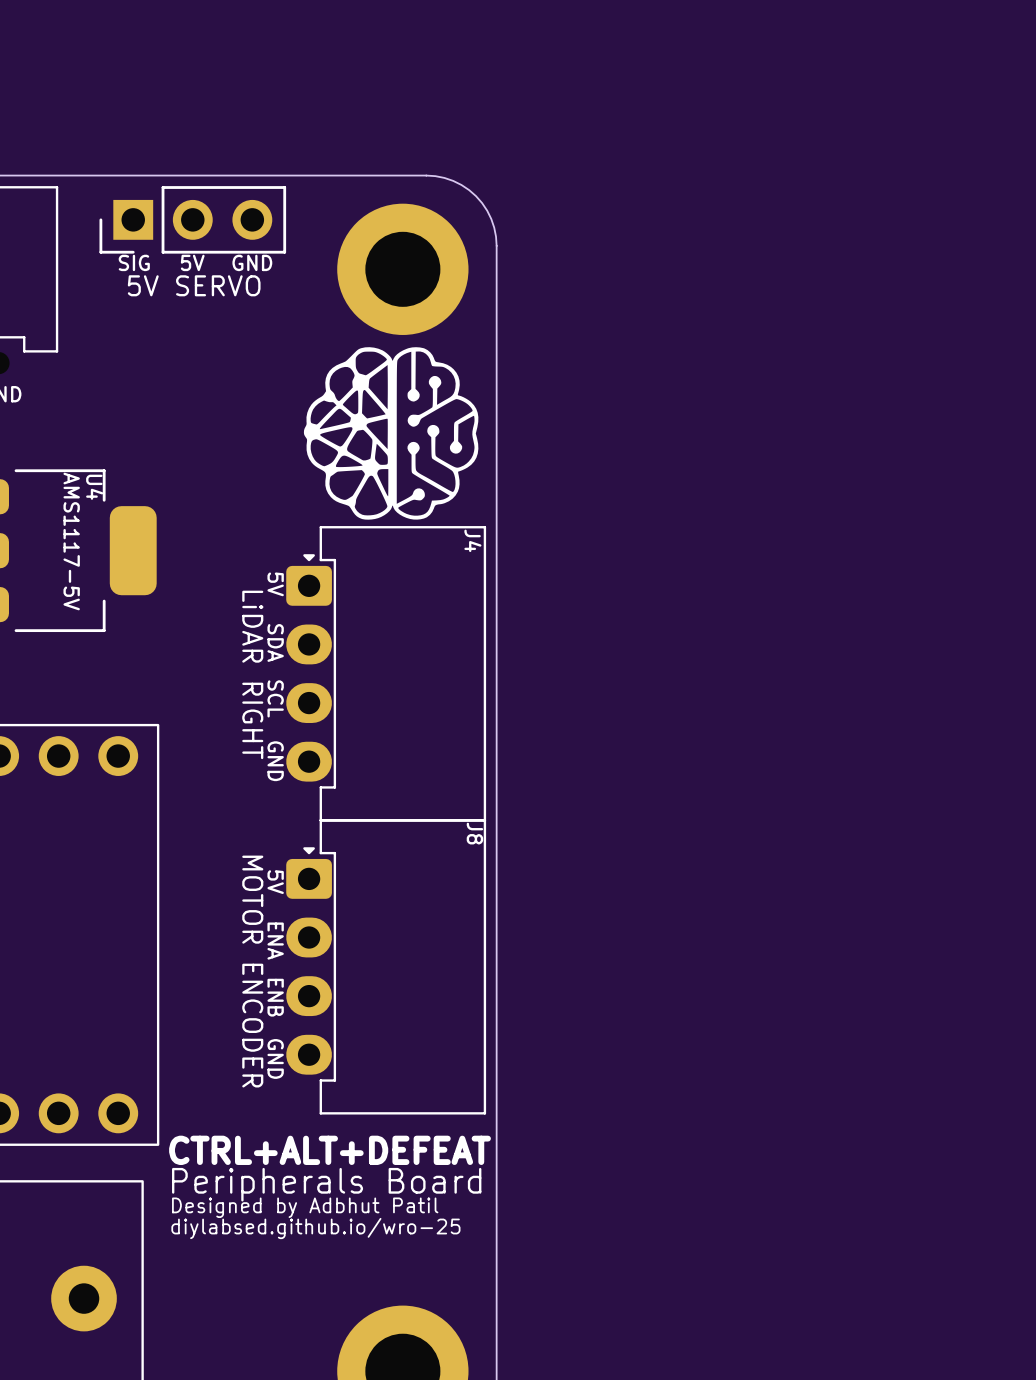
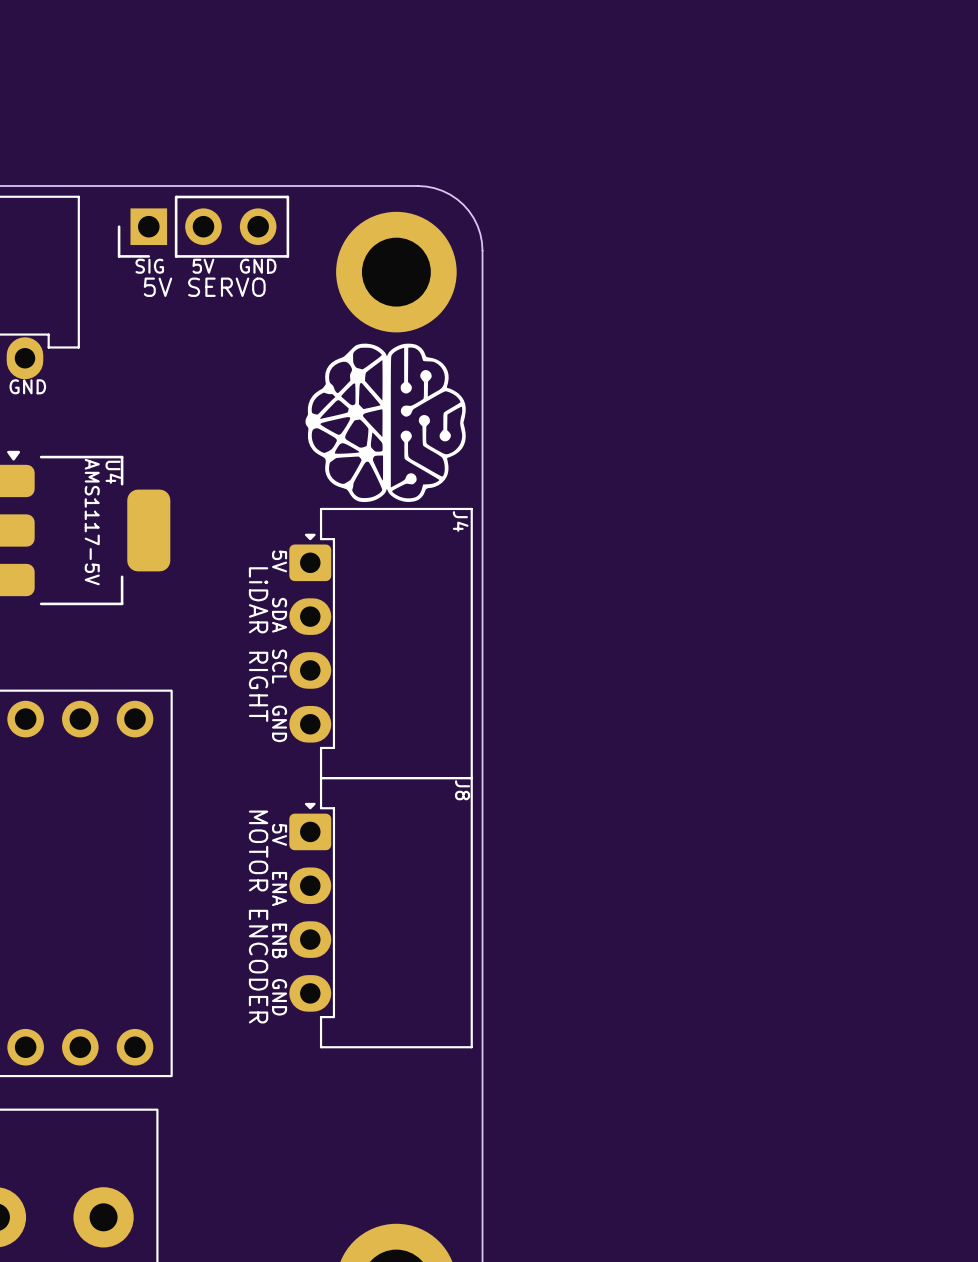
text: CTRL+ALT+DEFEAT (330, 1150) -> none
text: Peripherals Board (326, 1184) -> none
text: Designed by Adbhut Patil (305, 1207) -> none
text: diylabsed.github.io/wro-25 (315, 1228) -> none

